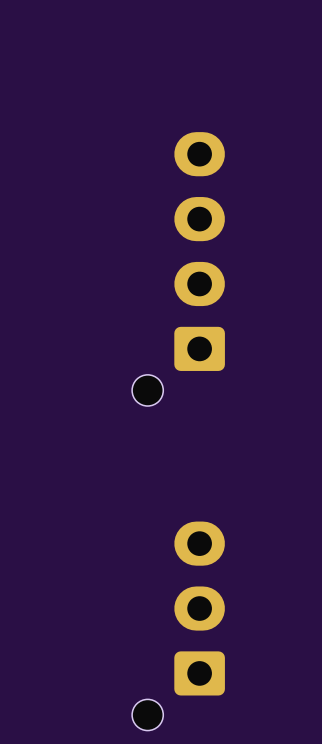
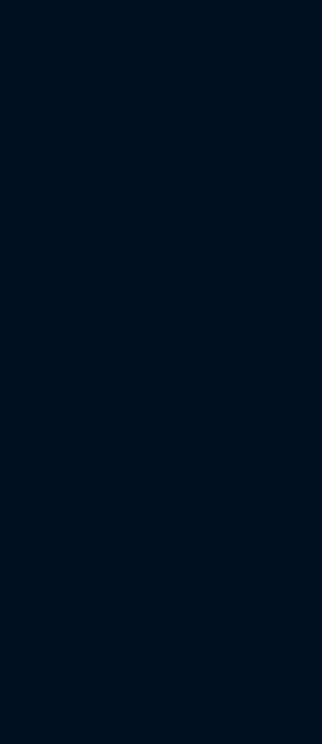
part: (178, 269) -> none
part: (178, 626) -> none

